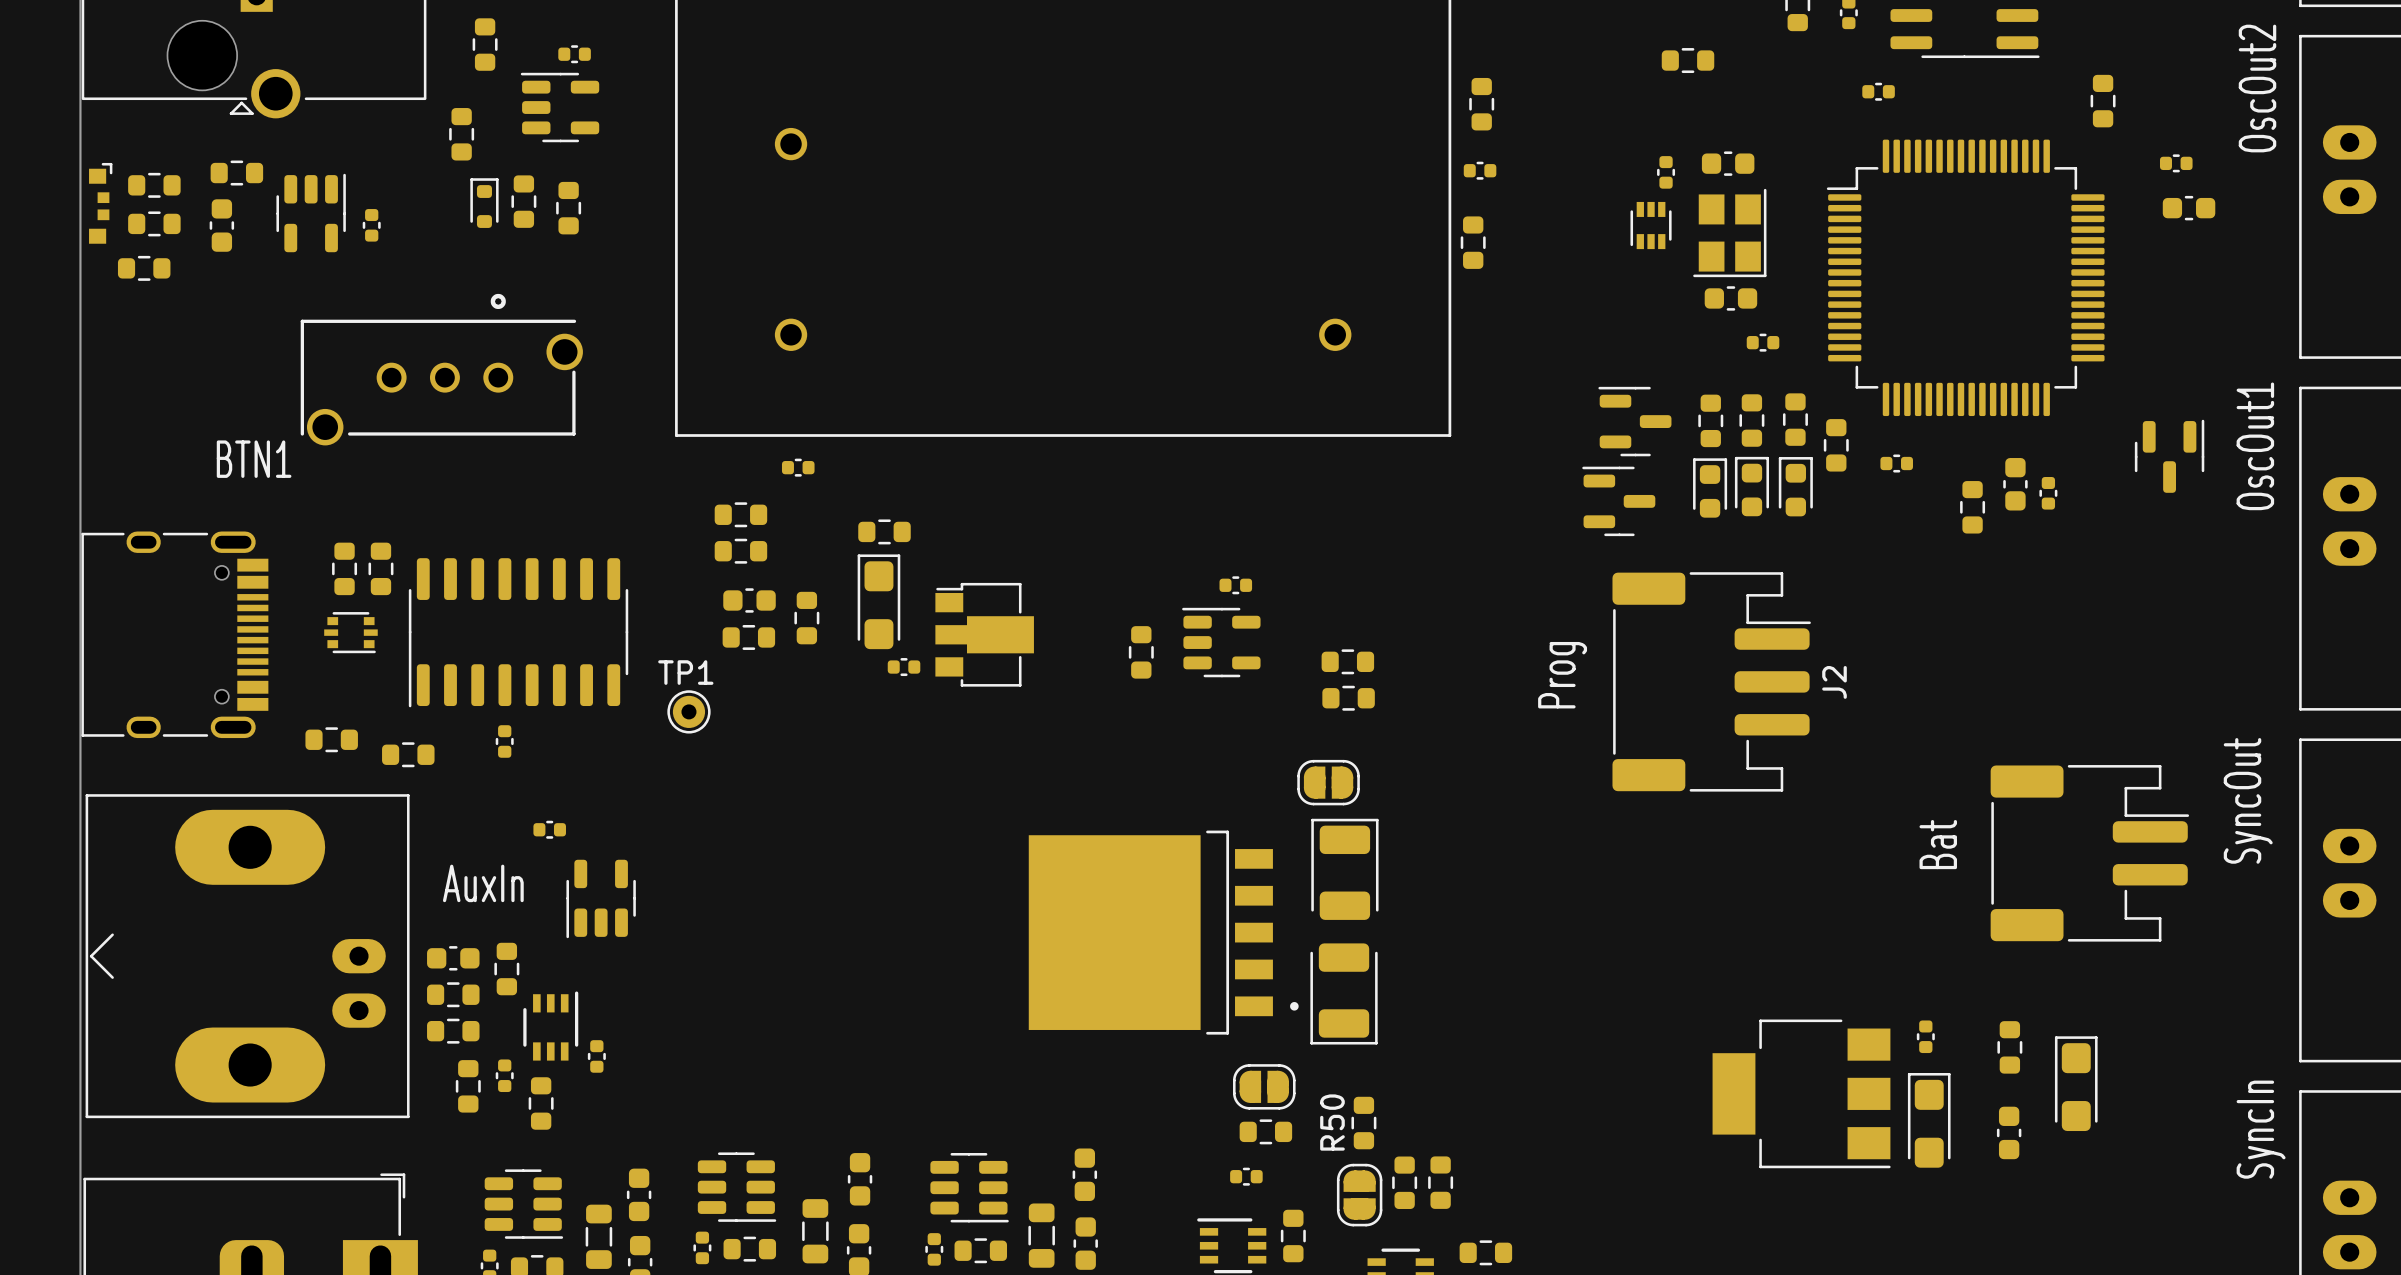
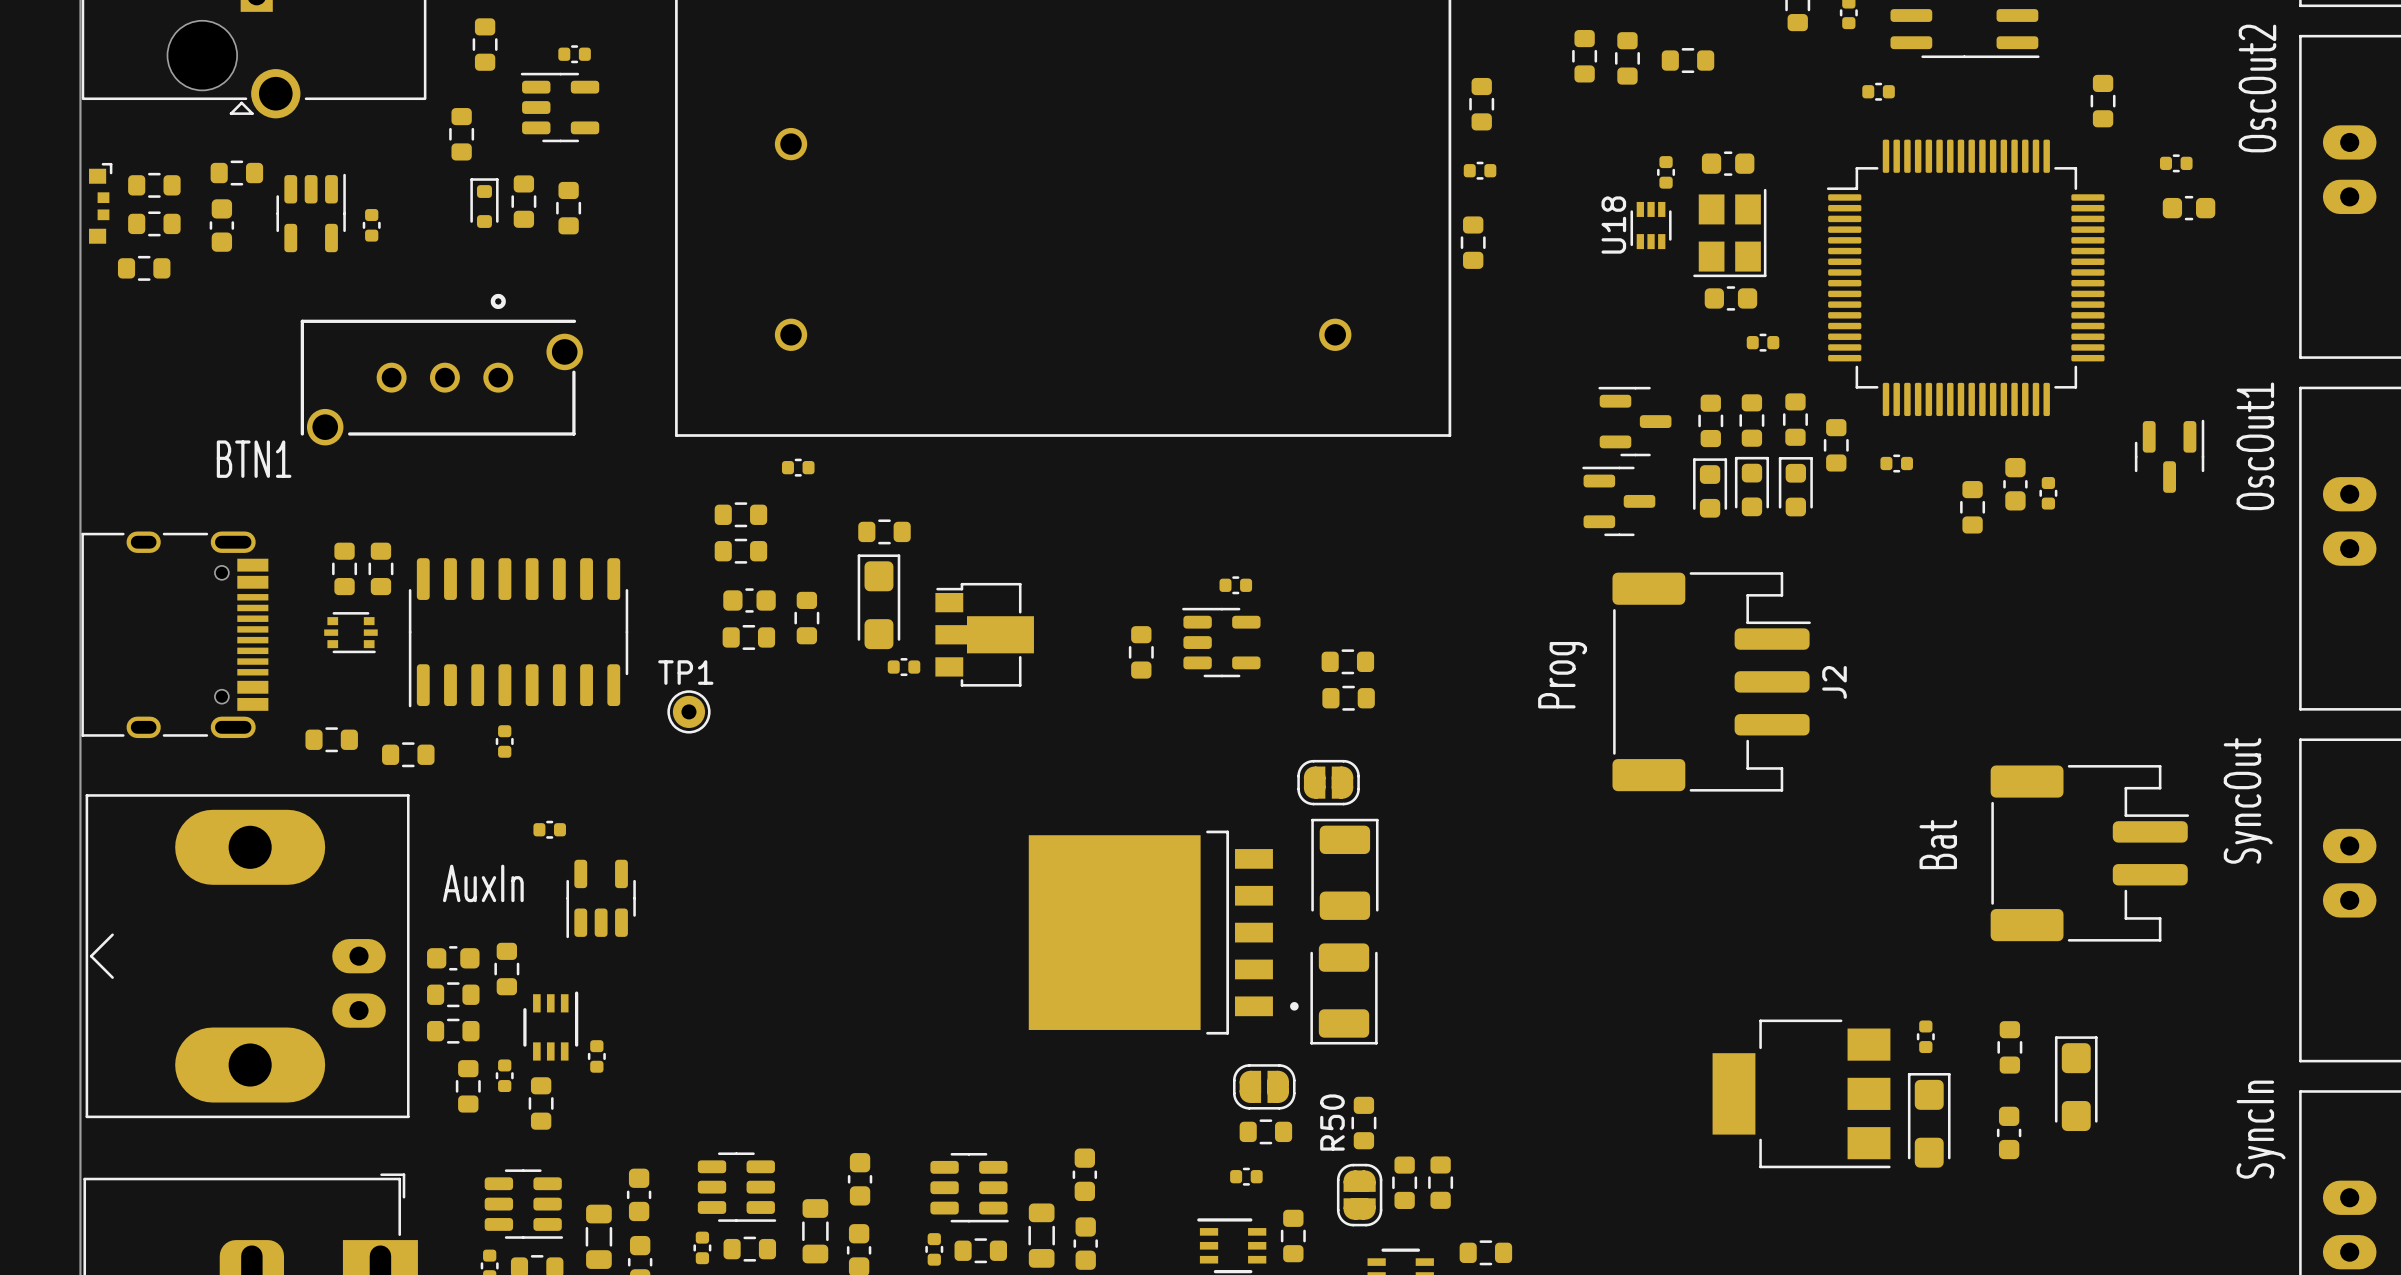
part: none -> (1584, 56)
part: none -> (1627, 58)
U18 name: none -> U18 (1613, 225)

